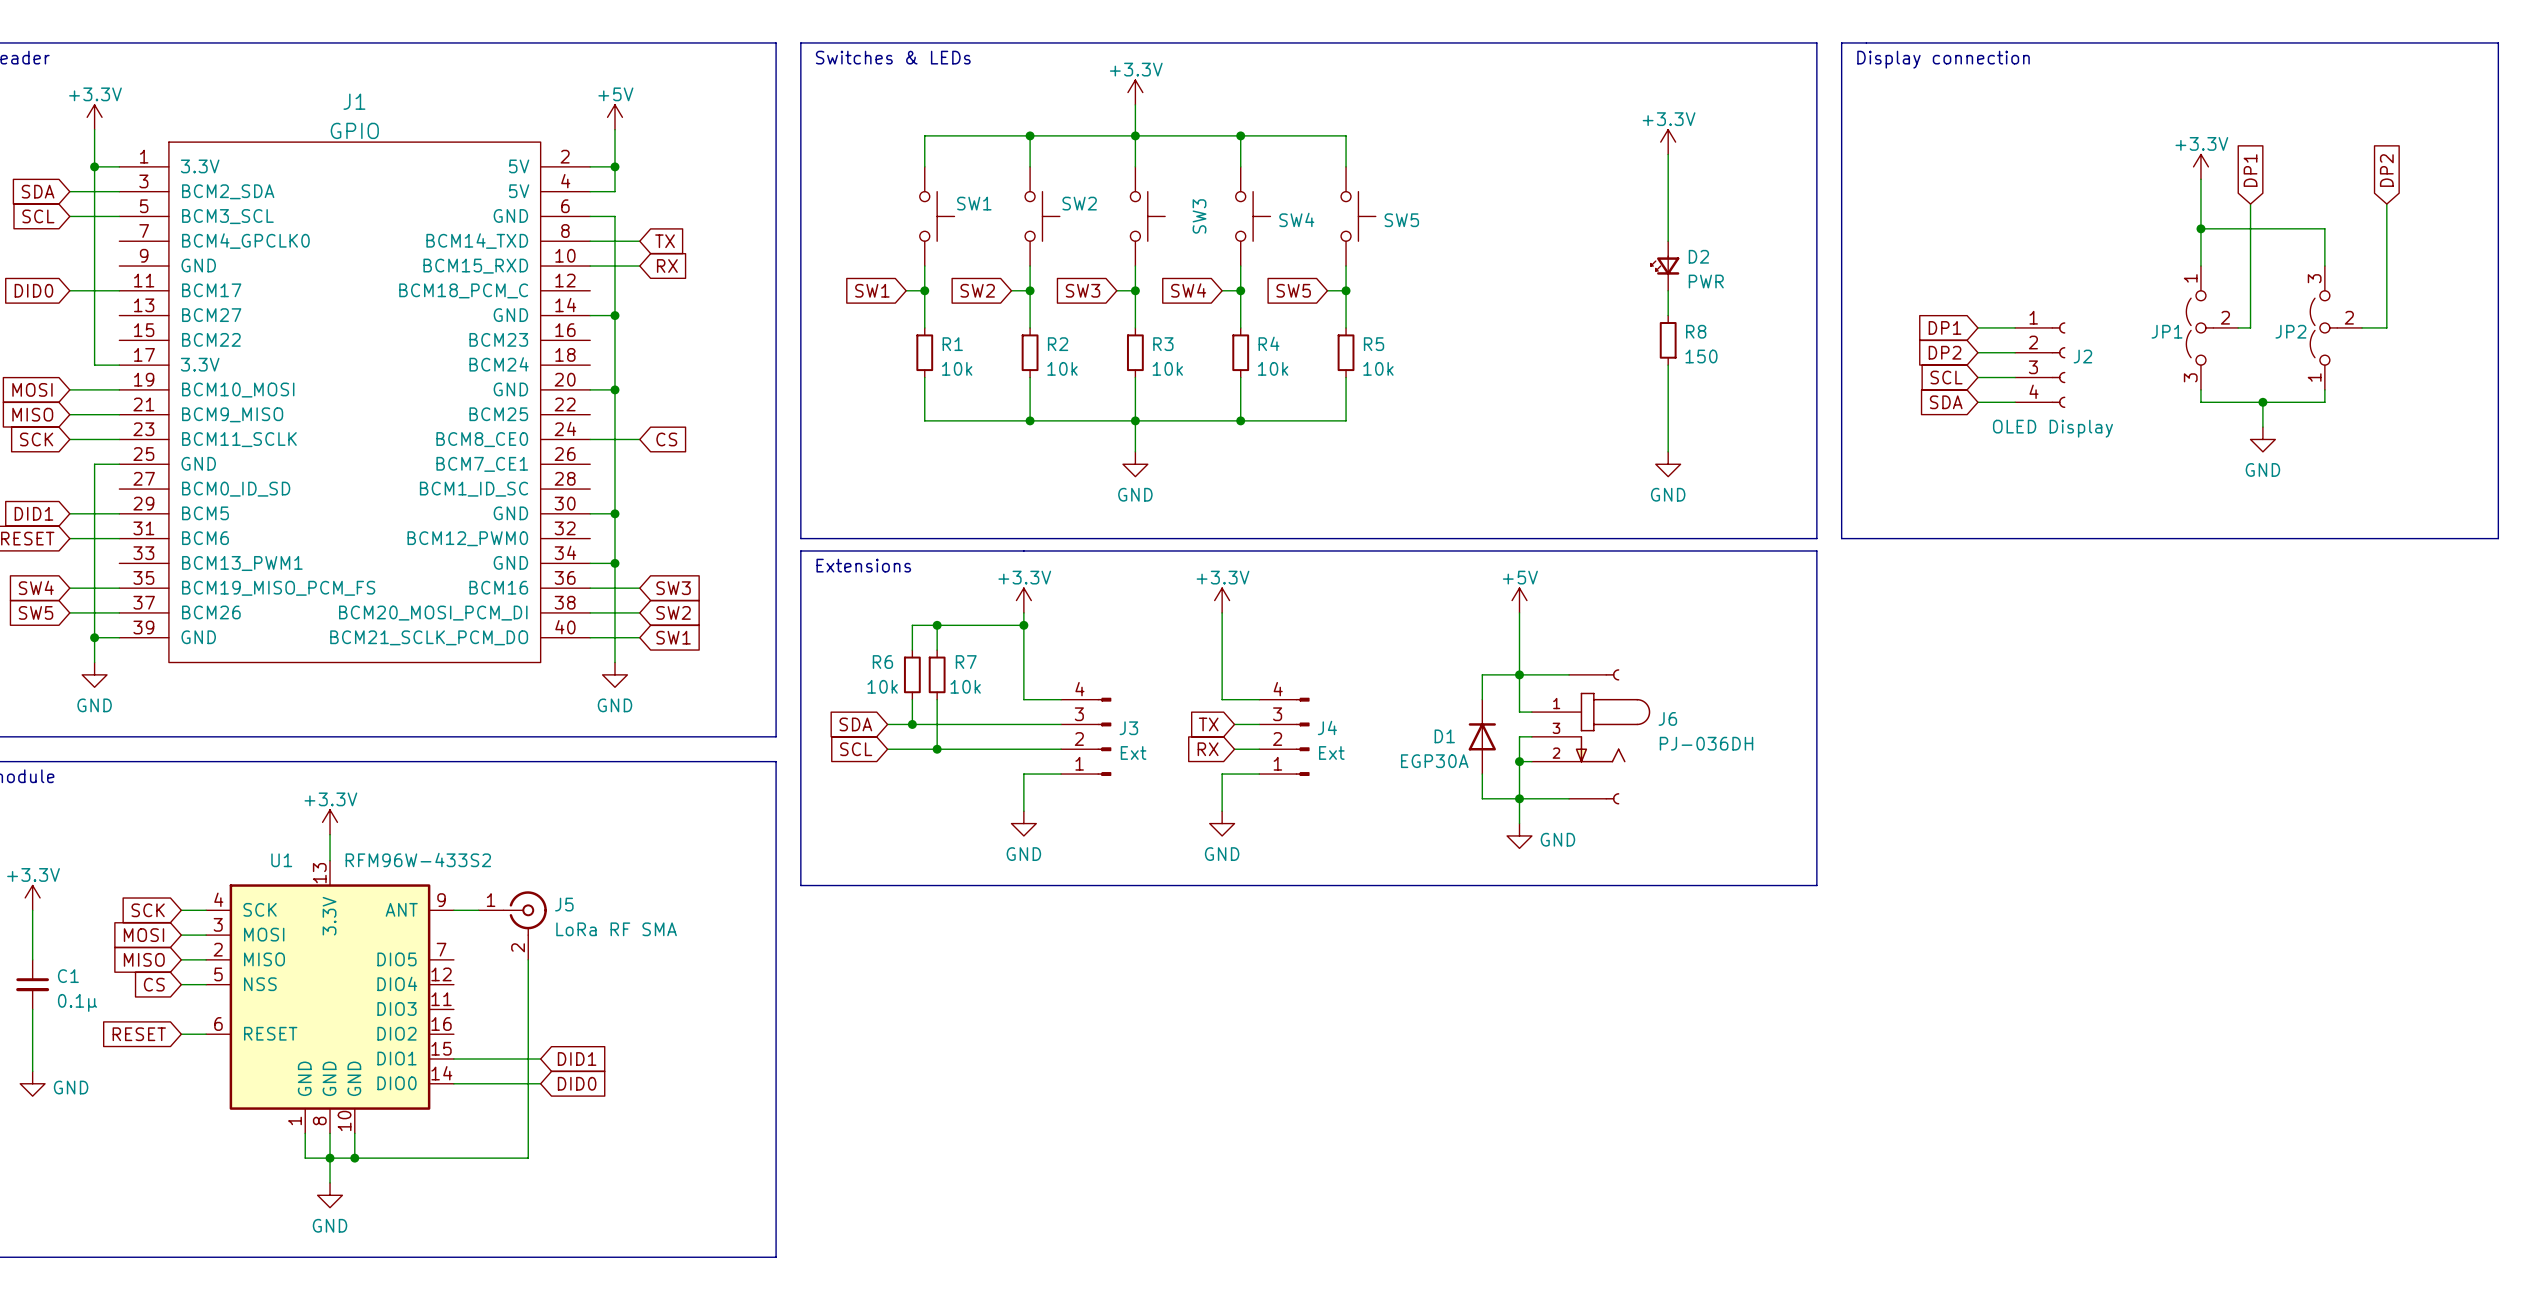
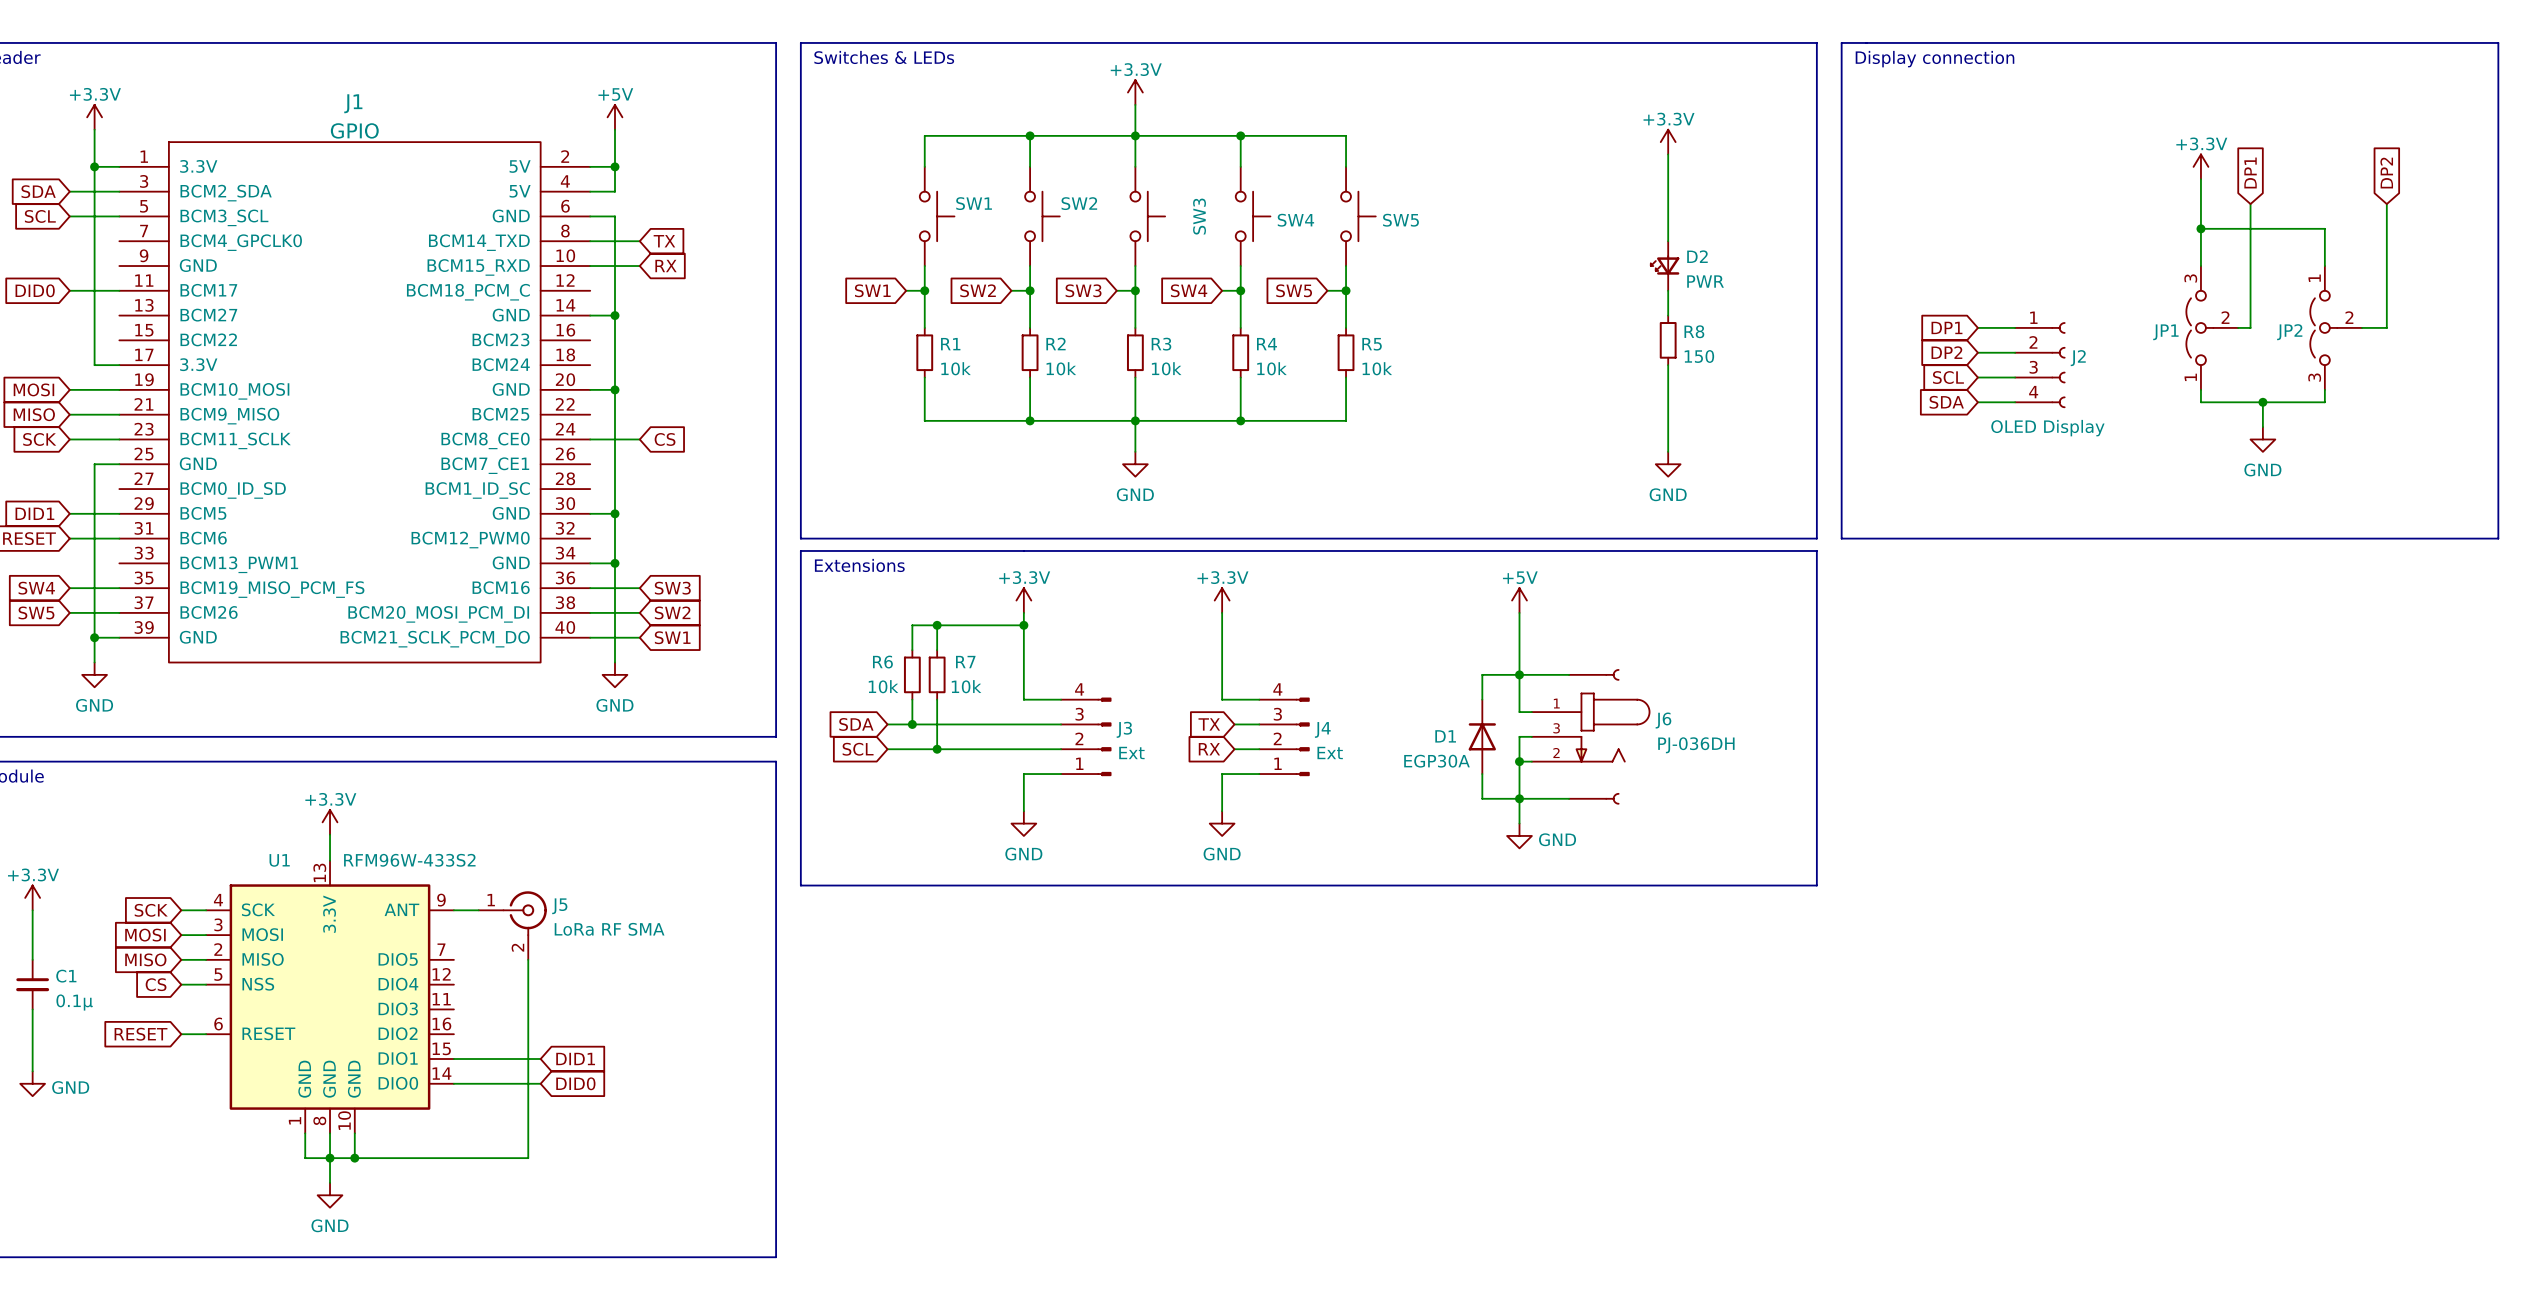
JP1 flip: as is (2199, 327) -> up-down (2199, 327)
JP2 flip: as is (2323, 327) -> up-down (2323, 327)

